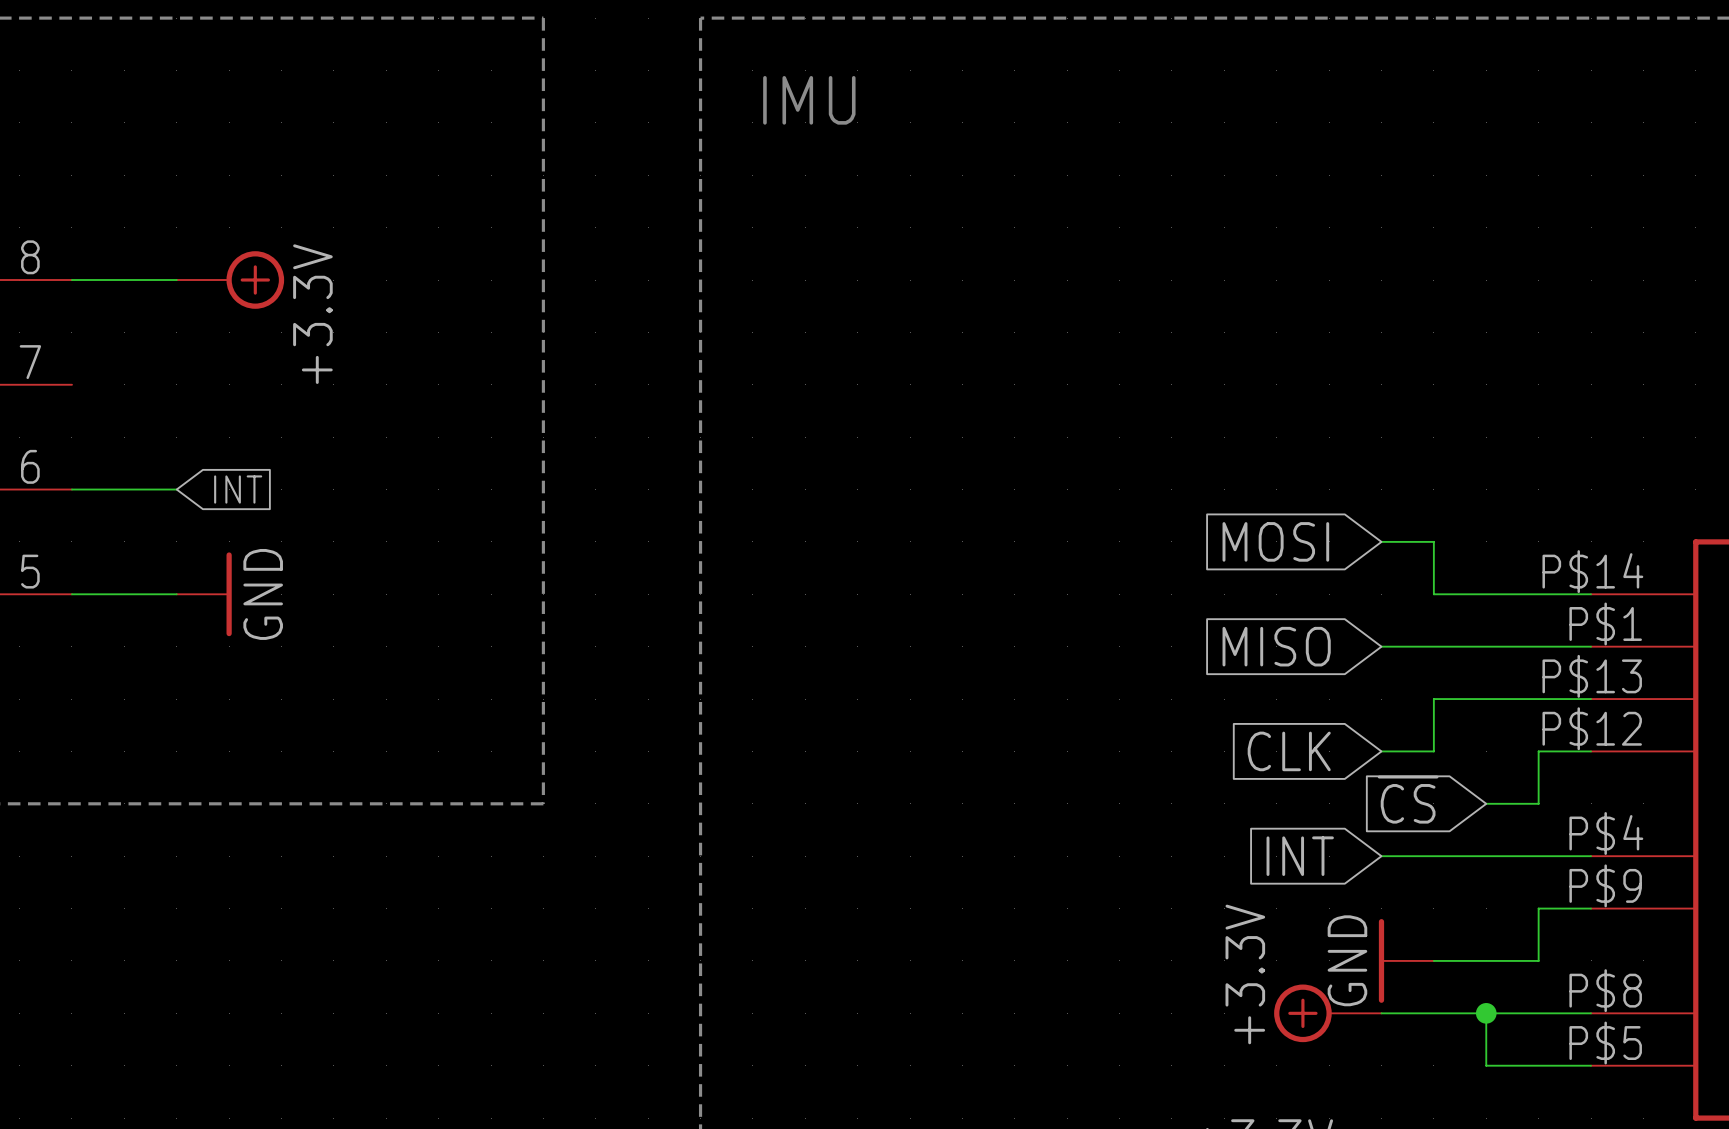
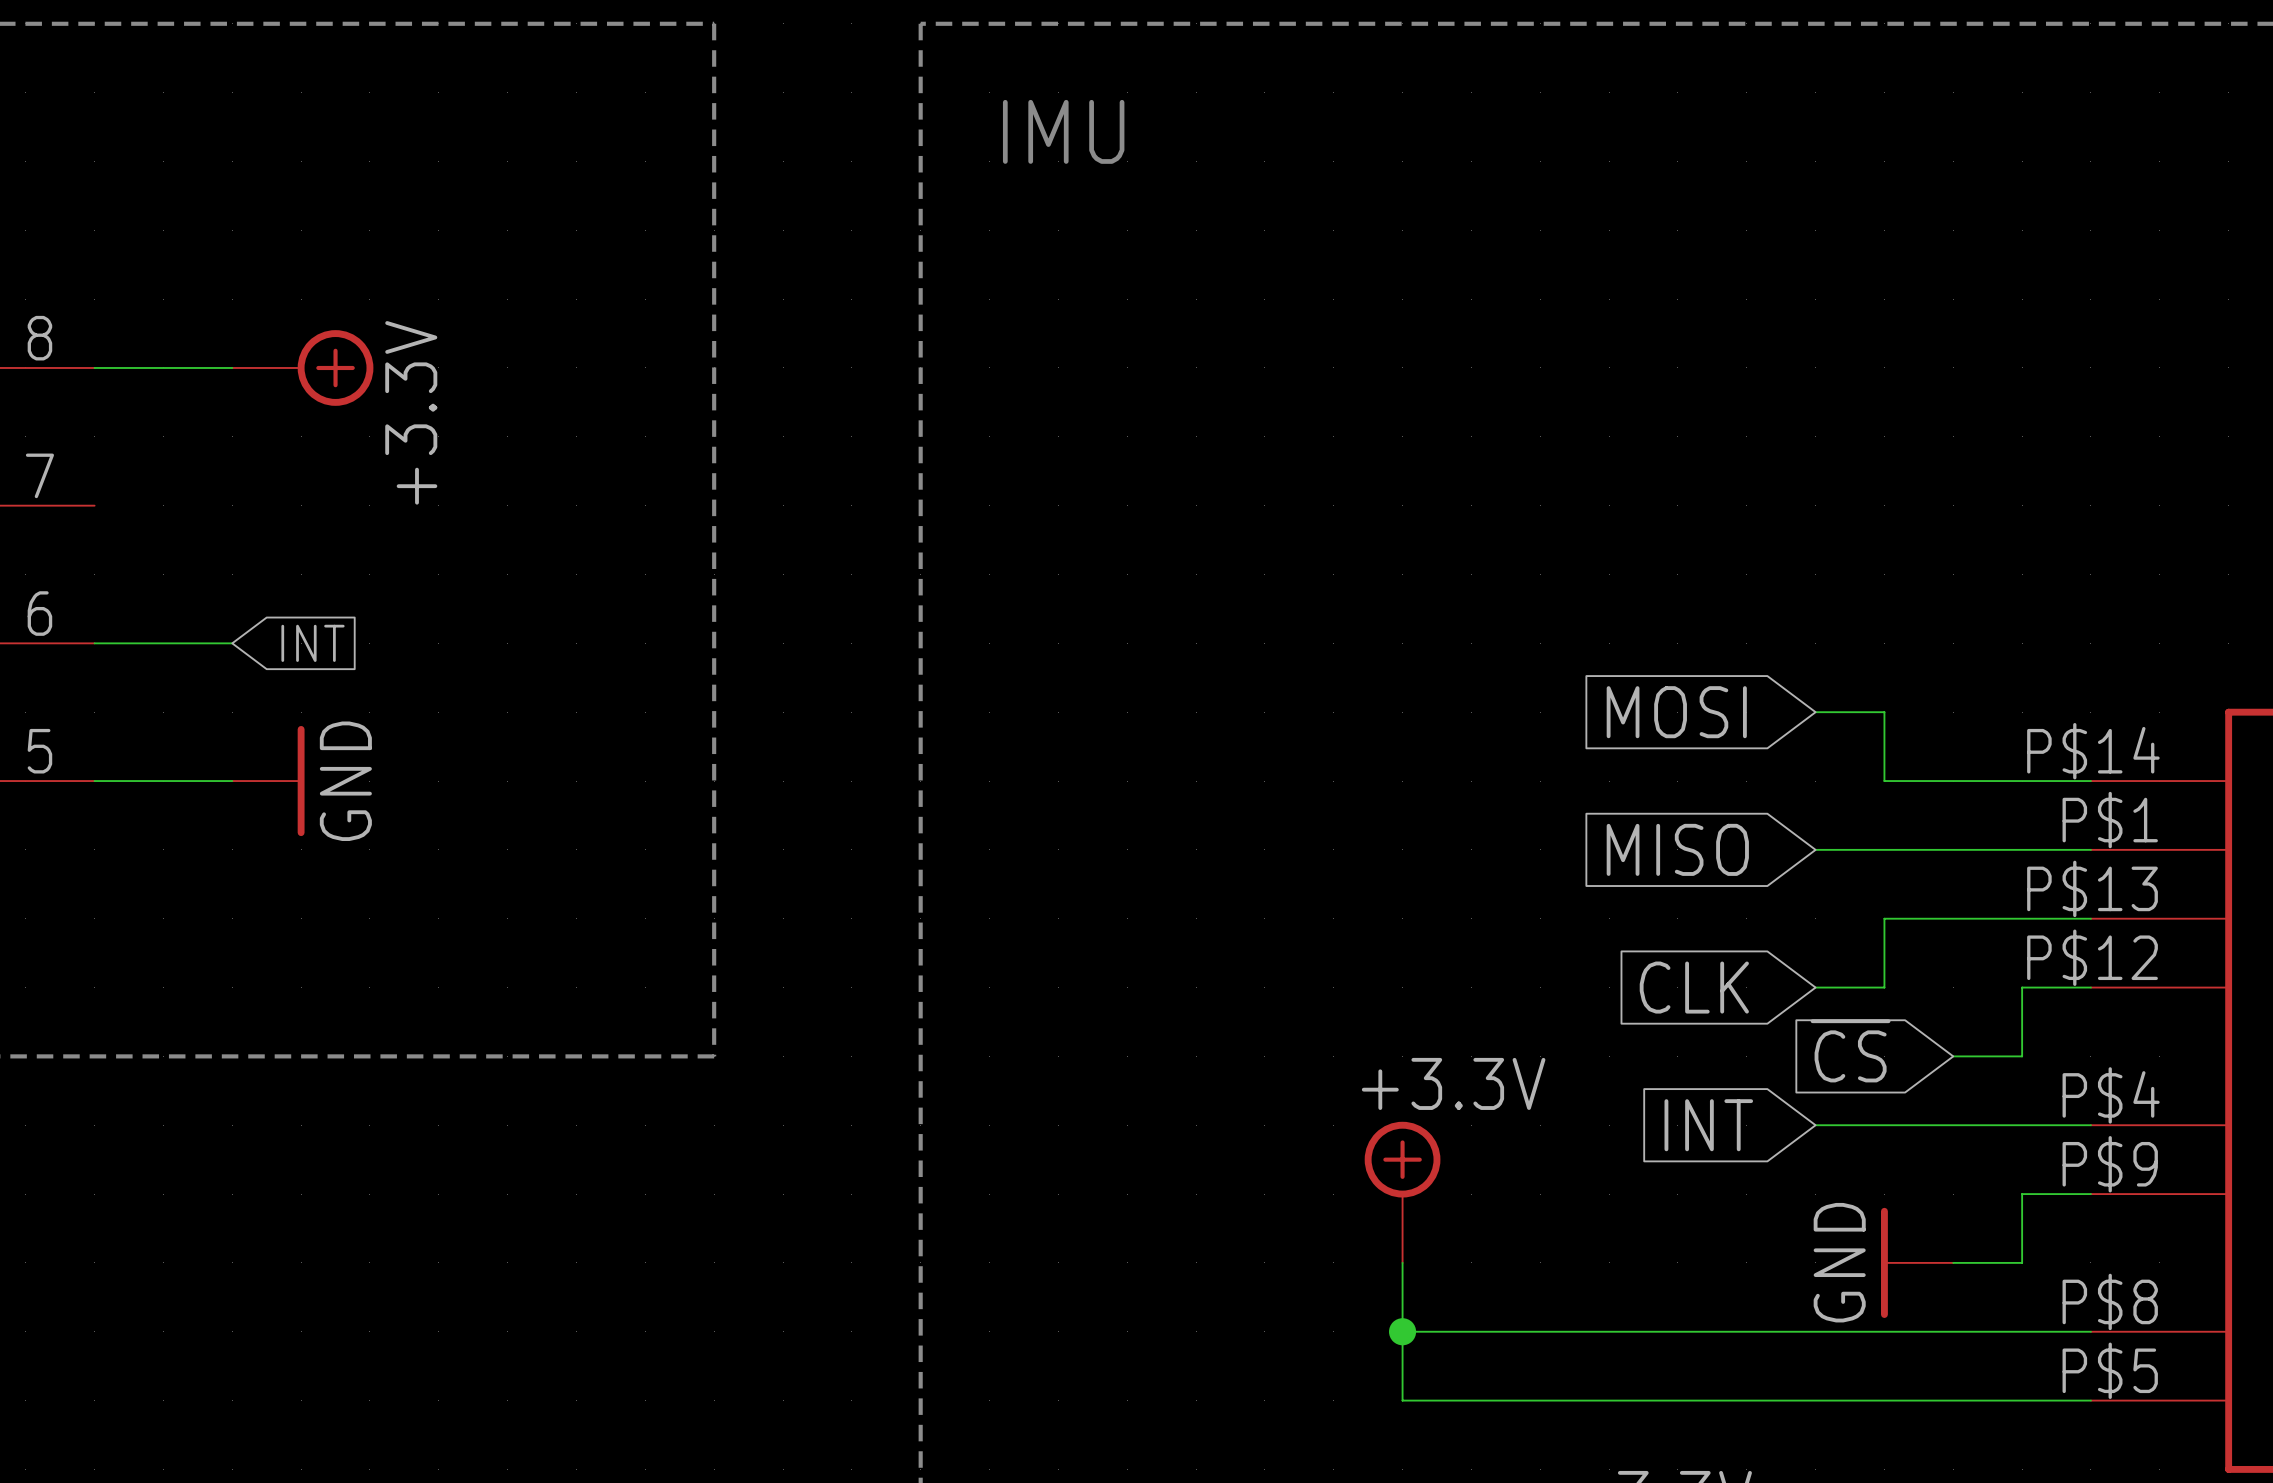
power symbol position: GND (1406, 960) -> GND (1917, 1262)
wire: none -> (1402, 1331) (1815, 1331)
junction: none -> (1402, 1331)
power symbol rotation: 0° (1302, 1013) -> 90° clockwise (1402, 1159)
power symbol position: +3.3V (1327, 1013) -> +3.3V (1402, 1192)
wire: (1486, 1013) (1486, 1065) -> (1402, 1262) (1402, 1400) (1953, 1400)
junction: (1486, 1013) -> none

